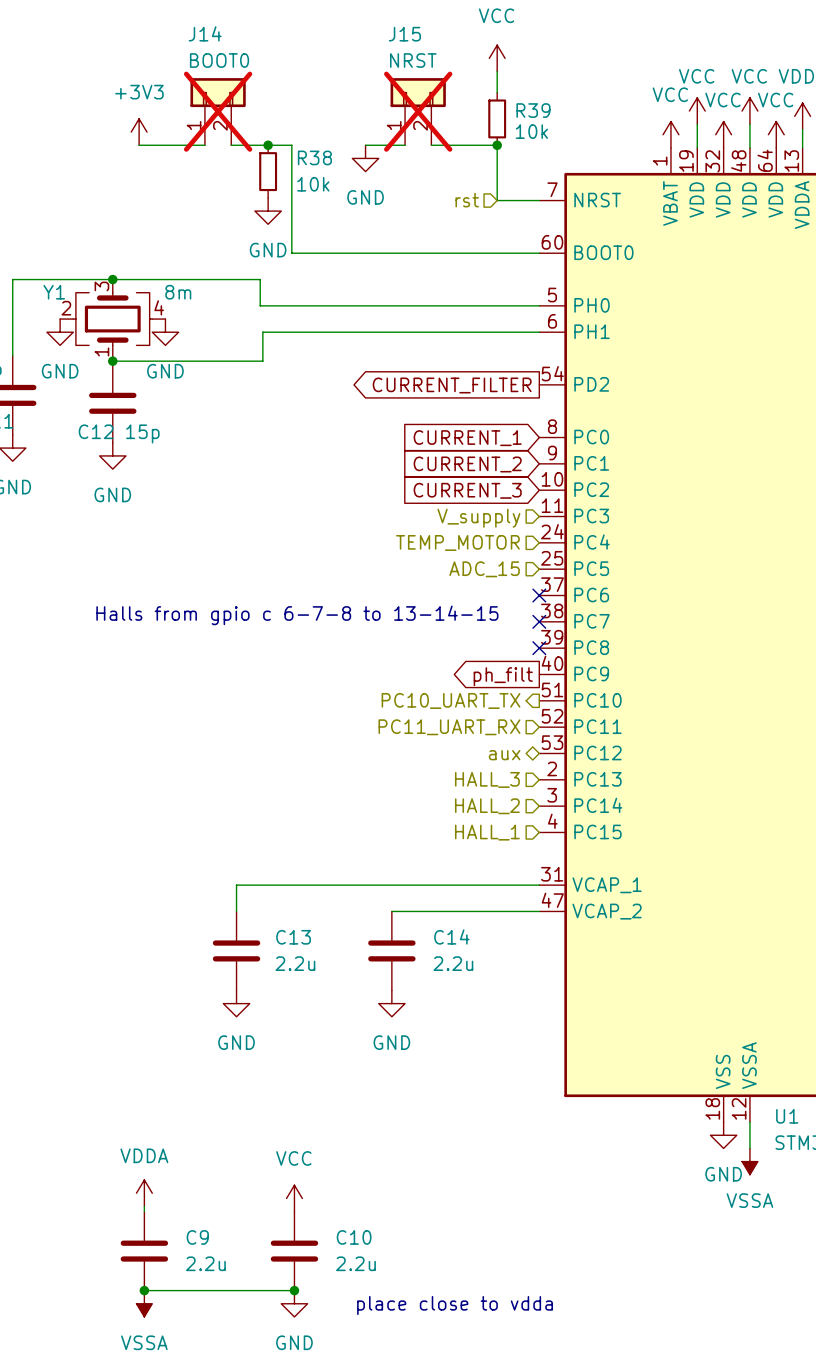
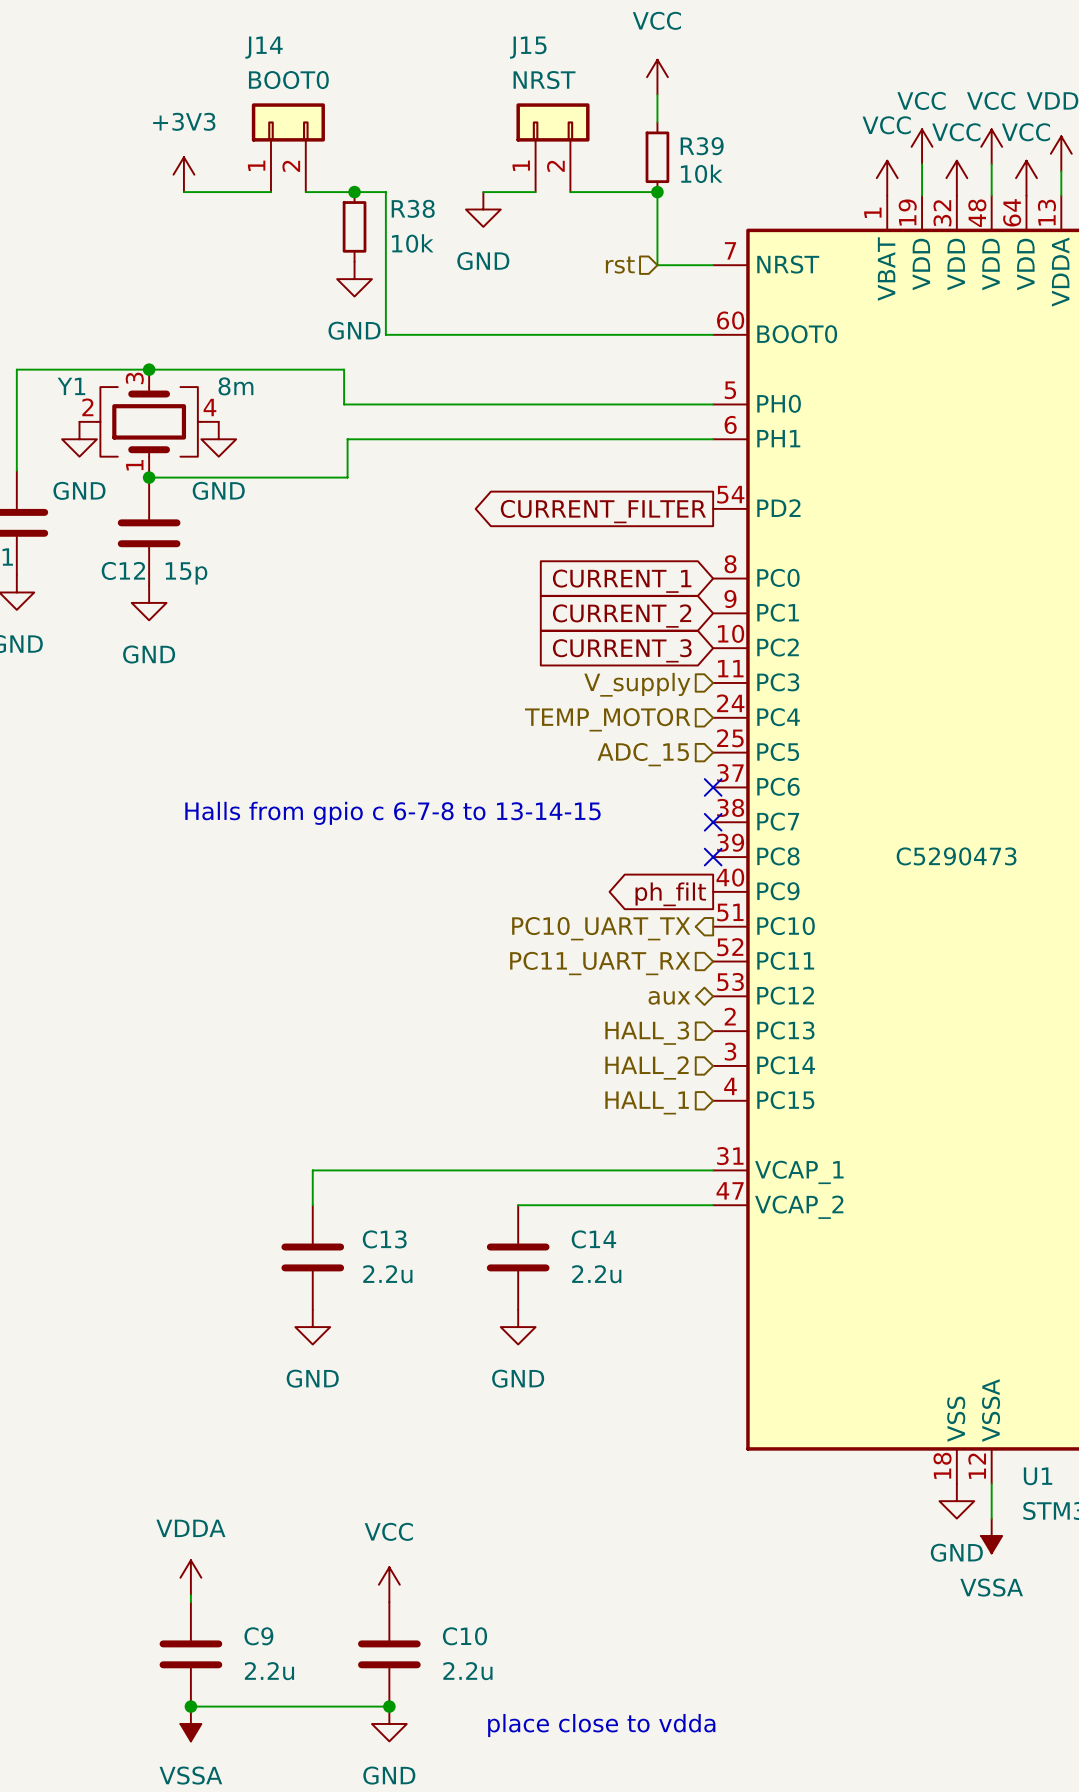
J14 do-not-place cross: (218, 111) -> none
J15 do-not-place cross: (418, 111) -> none
U1 text: none -> C5290473 (956, 856)

